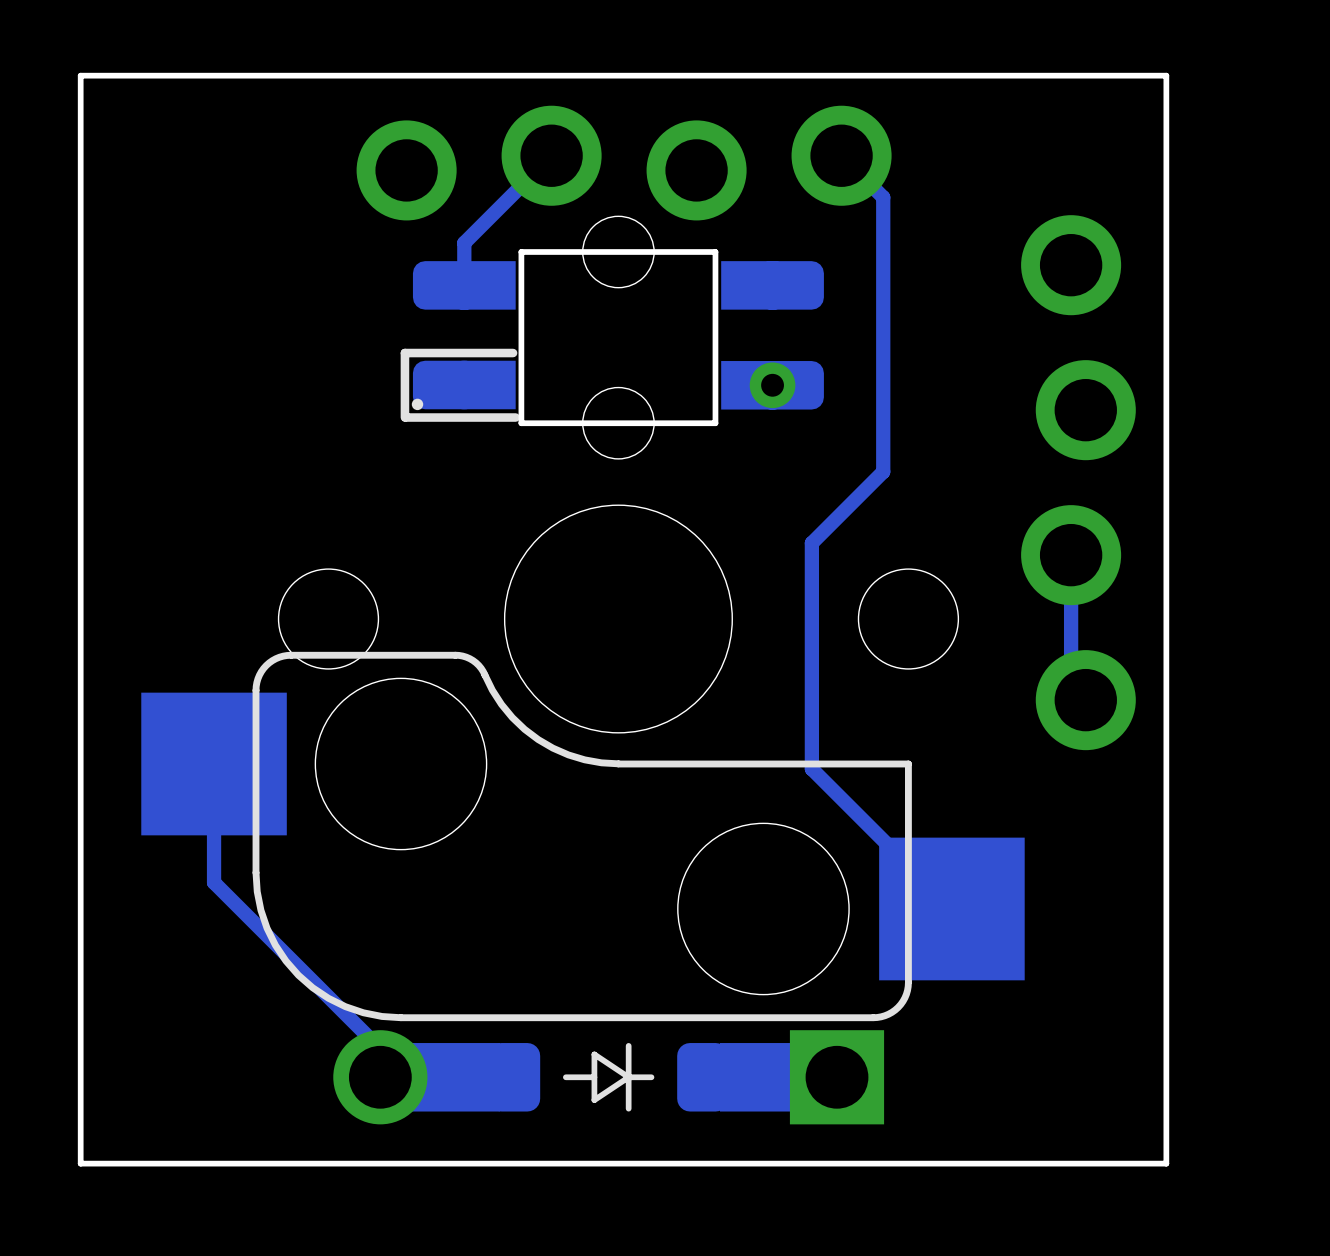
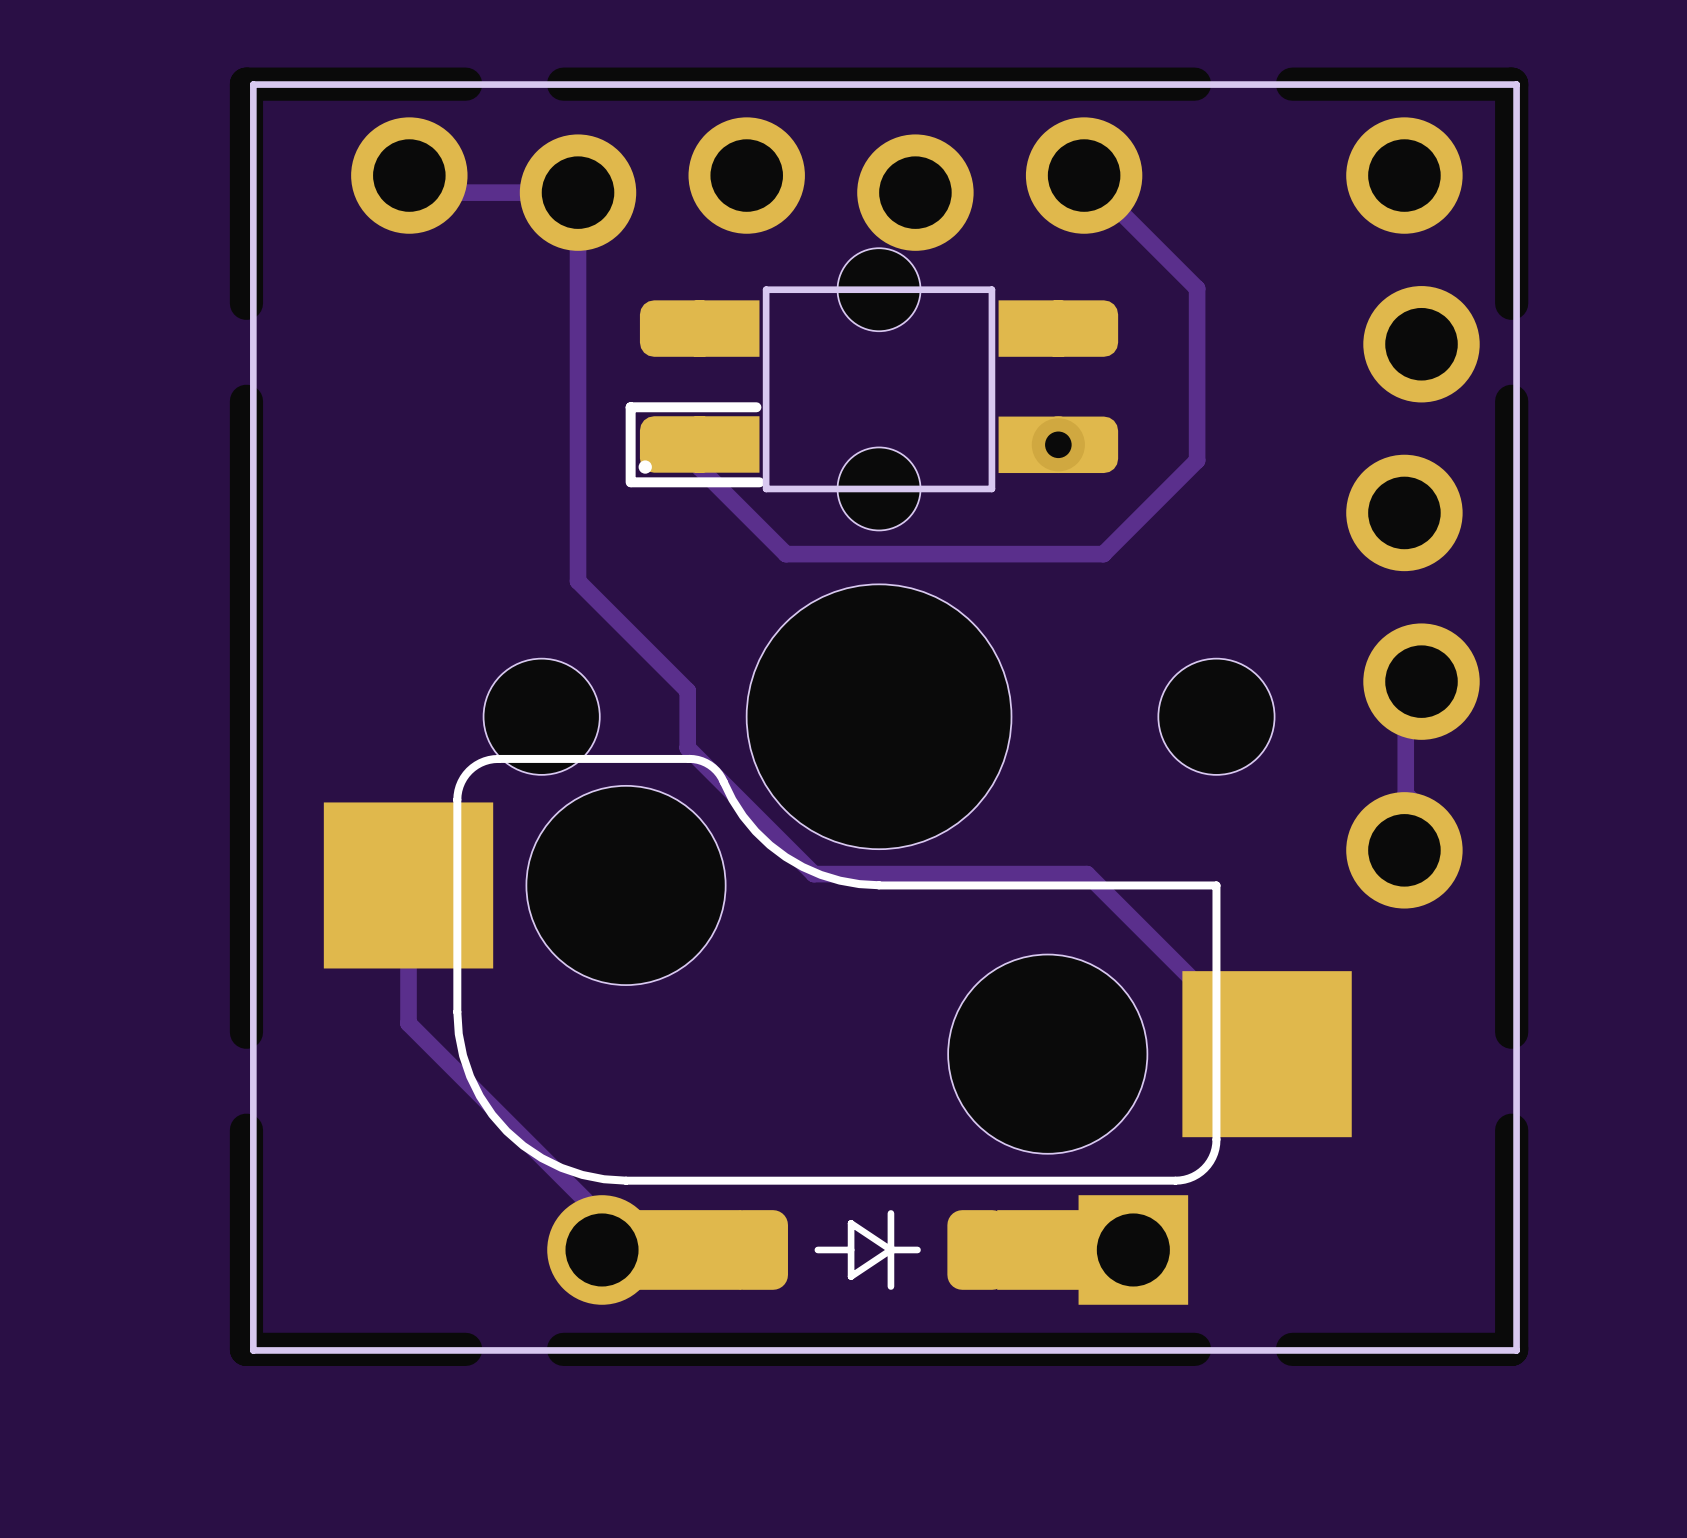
track: none -> (1084, 175) (1197, 288) (1197, 460) (1103, 554) (785, 554) (699, 467) (699, 444)
track: (551, 155) (464, 243) (464, 285) -> none
track: (841, 155) (883, 197) (883, 471) (811, 543) (811, 768) -> (409, 176) (425, 192) (578, 192) (578, 581) (687, 690) (687, 747) (813, 874) (1087, 874) (1104, 891)
part: none -> (746, 184)
part: (624, 163) -> none
part footprint: [1021, 215, 1136, 751] -> [1346, 117, 1480, 909]

